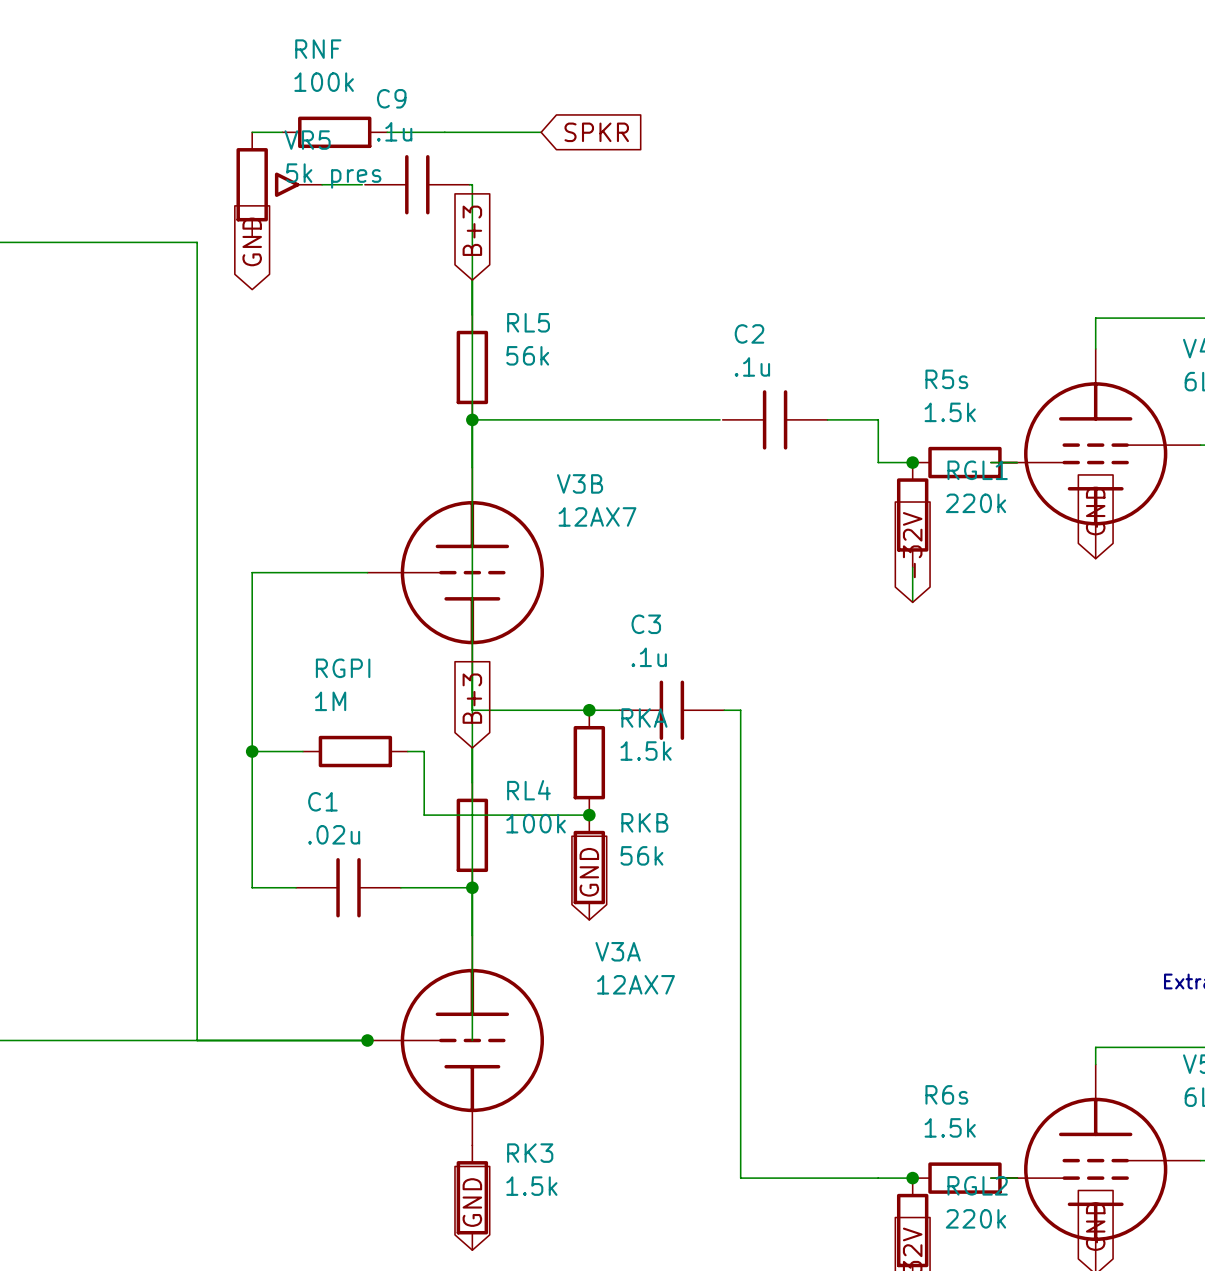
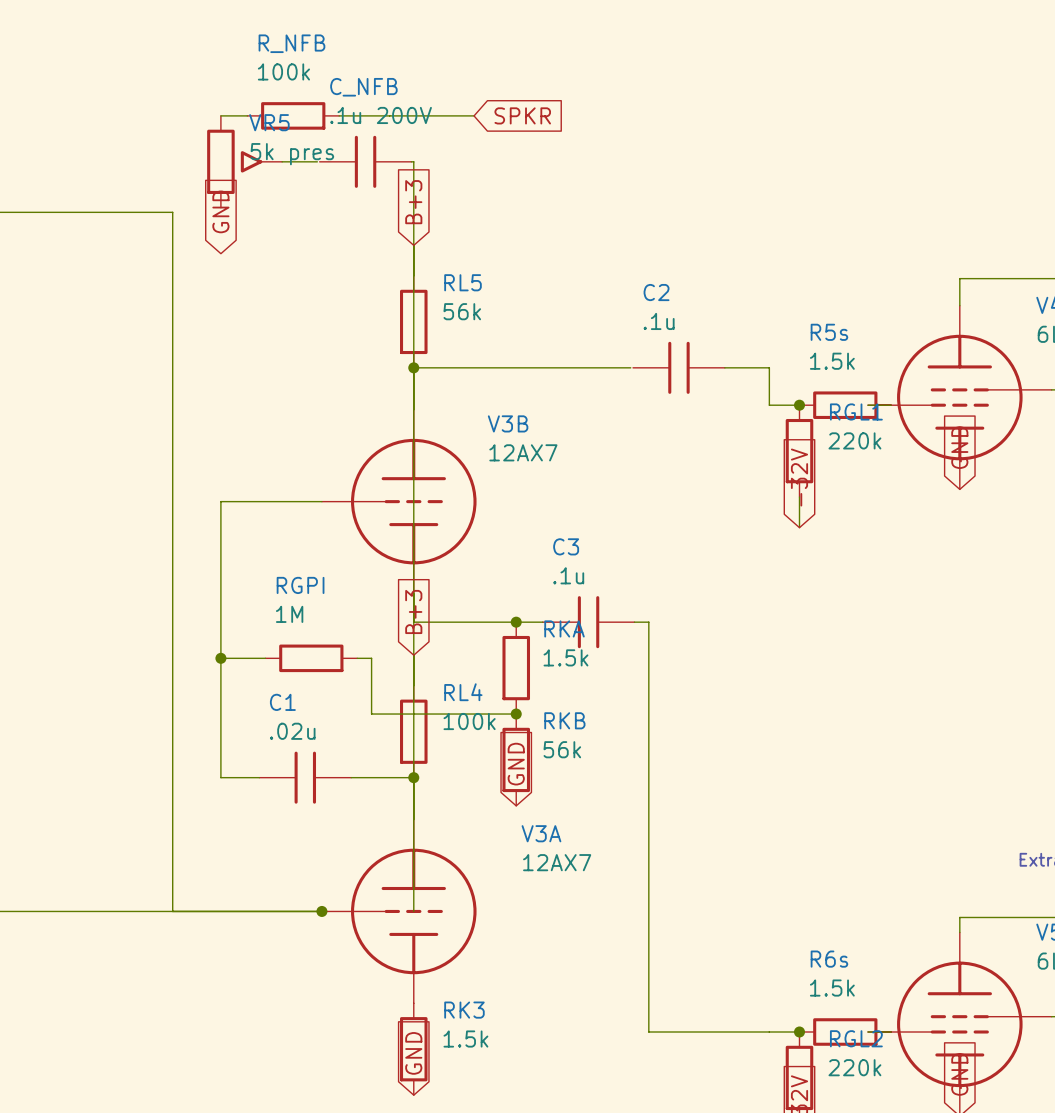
RNF name: RNF (318, 49) -> R_NFB (291, 43)
C9 name: C9 (391, 98) -> C_NFB (363, 87)
C9 value: .1u (394, 131) -> .1u 200V (381, 115)

